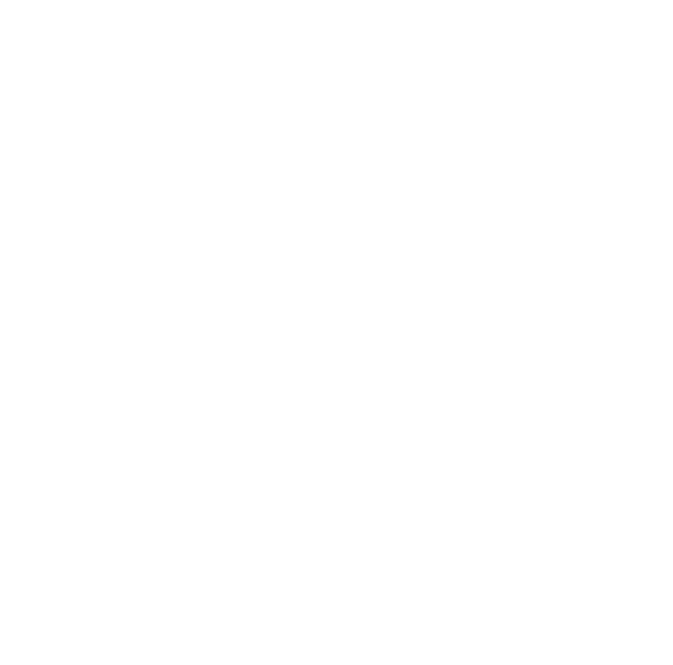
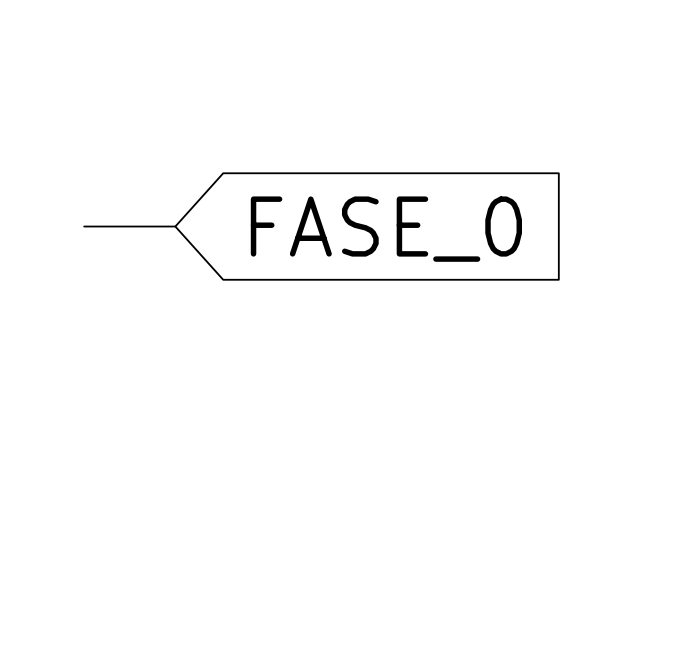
wire: none -> (84, 226) (175, 226)
global label: none -> FASE_0 (386, 229)

